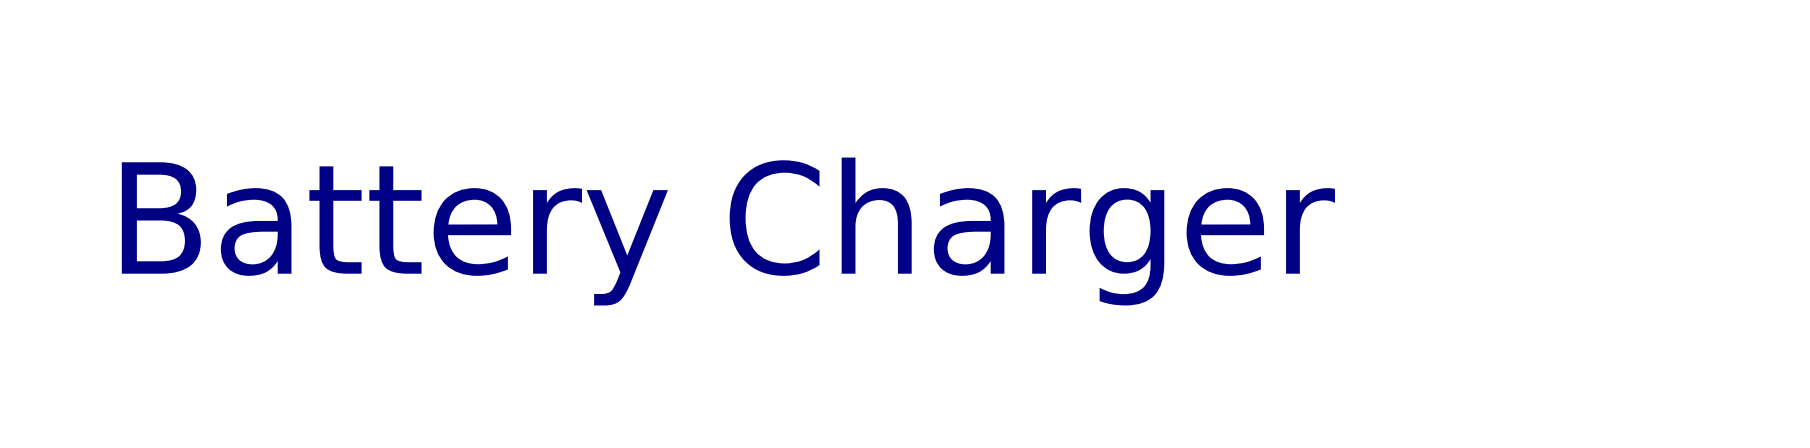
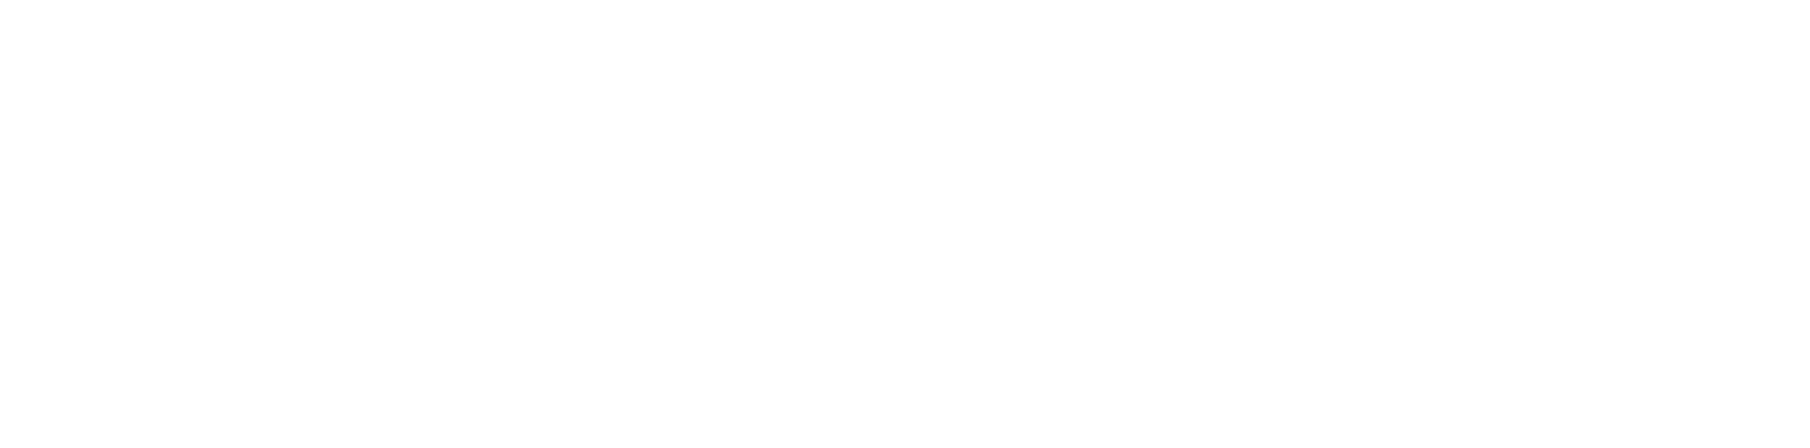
text: Battery Charger (728, 231) -> none

